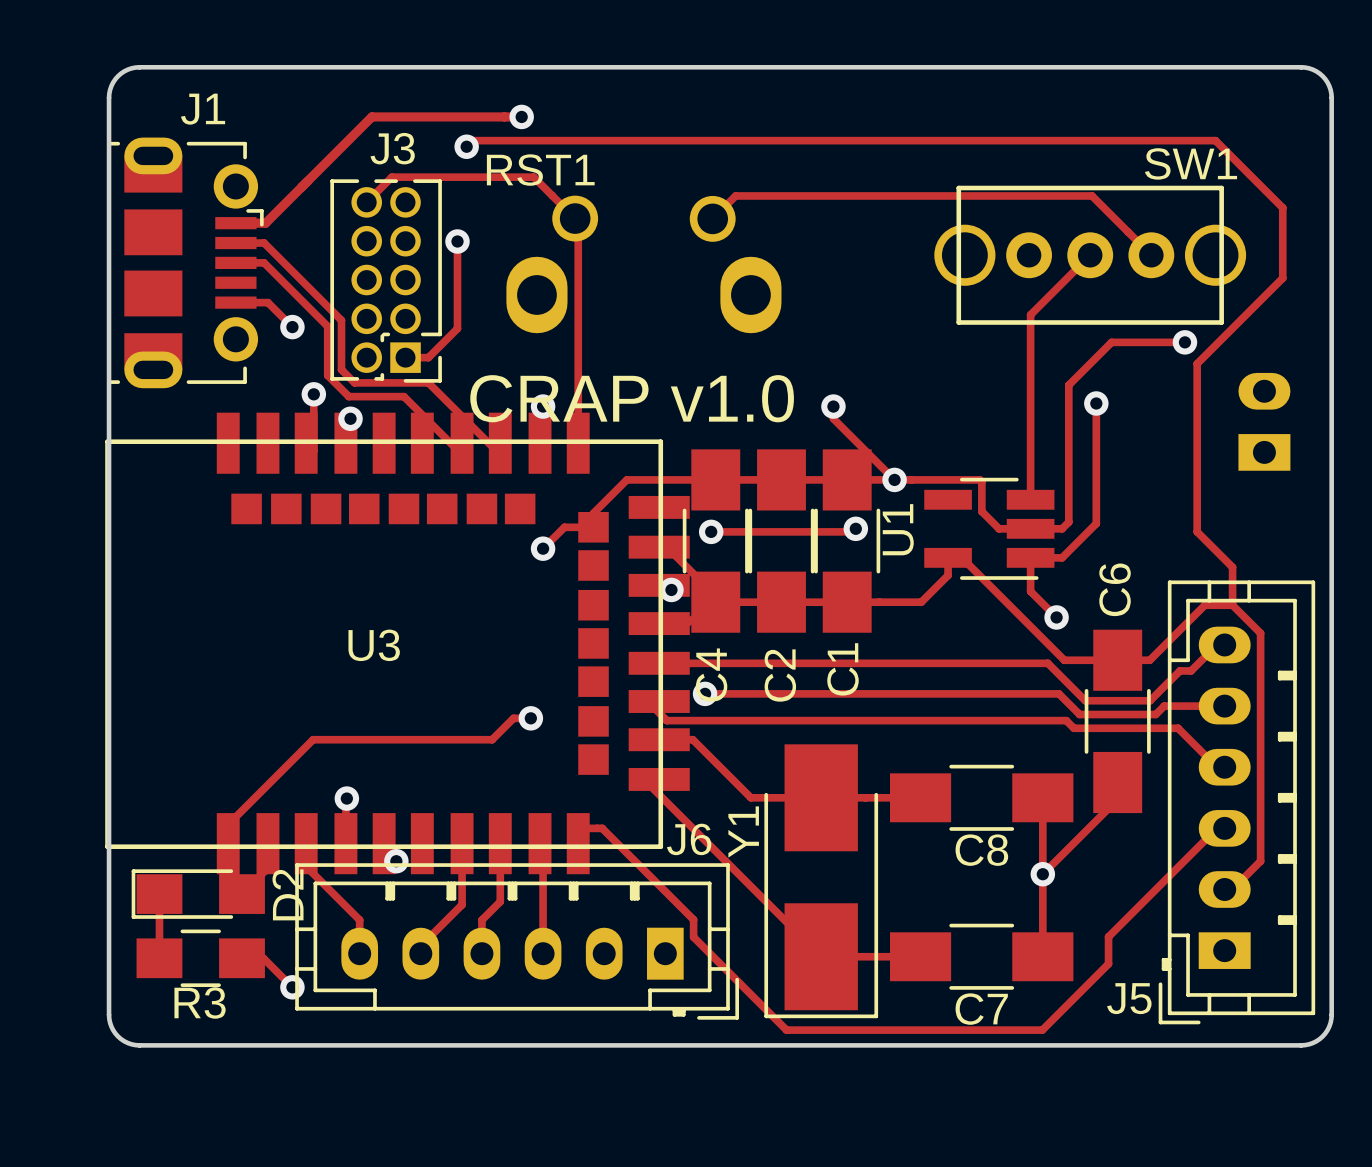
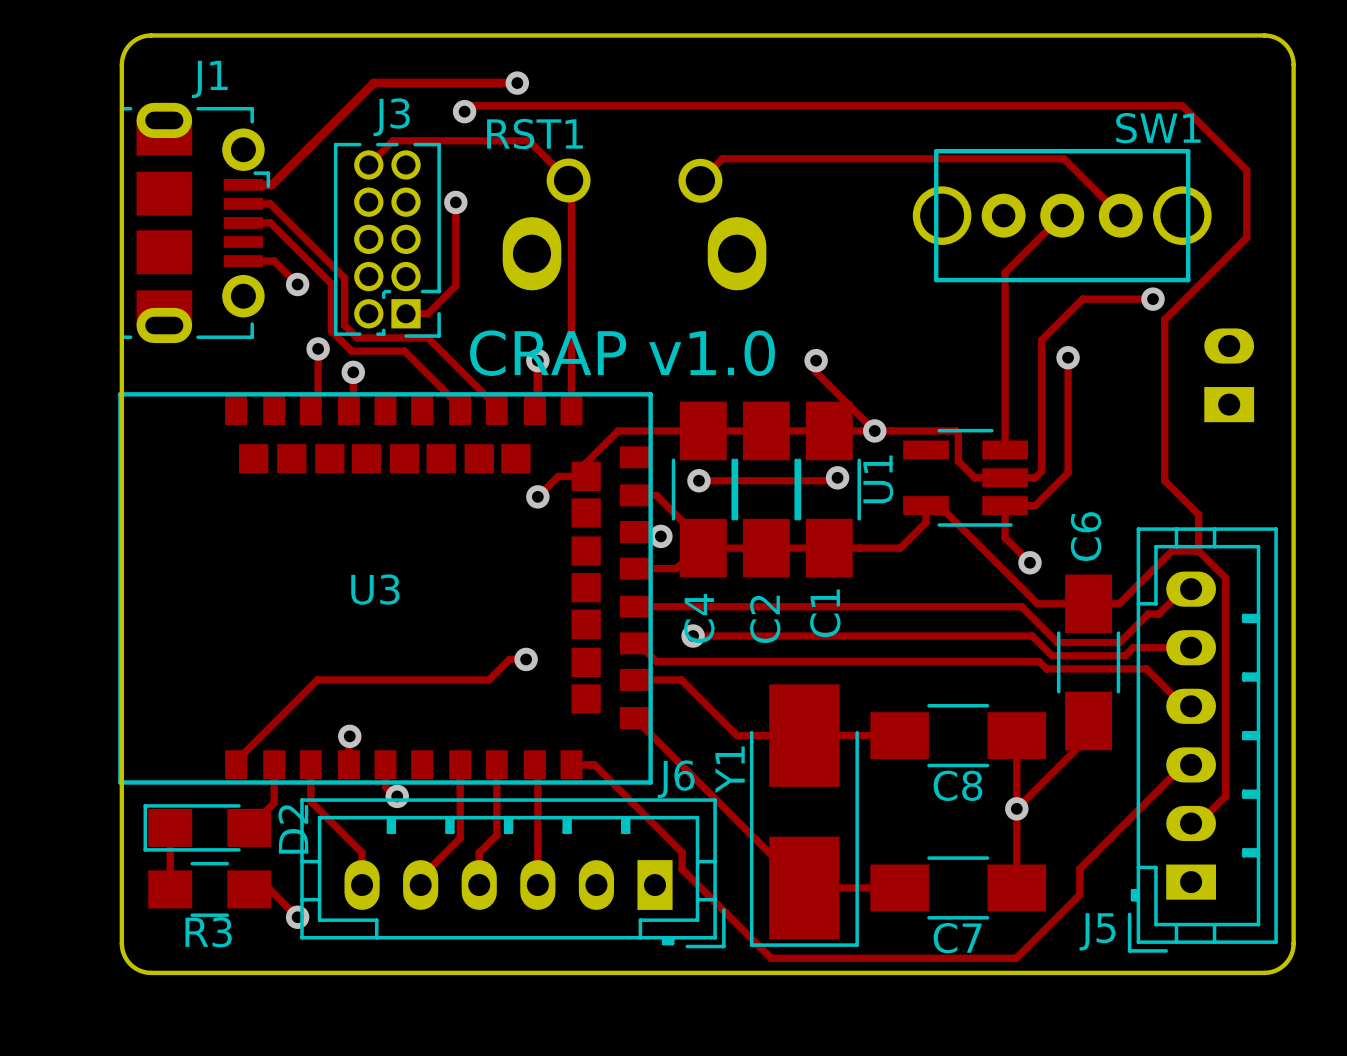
U3 footprint: [105, 412, 690, 875] -> [118, 392, 653, 785]

